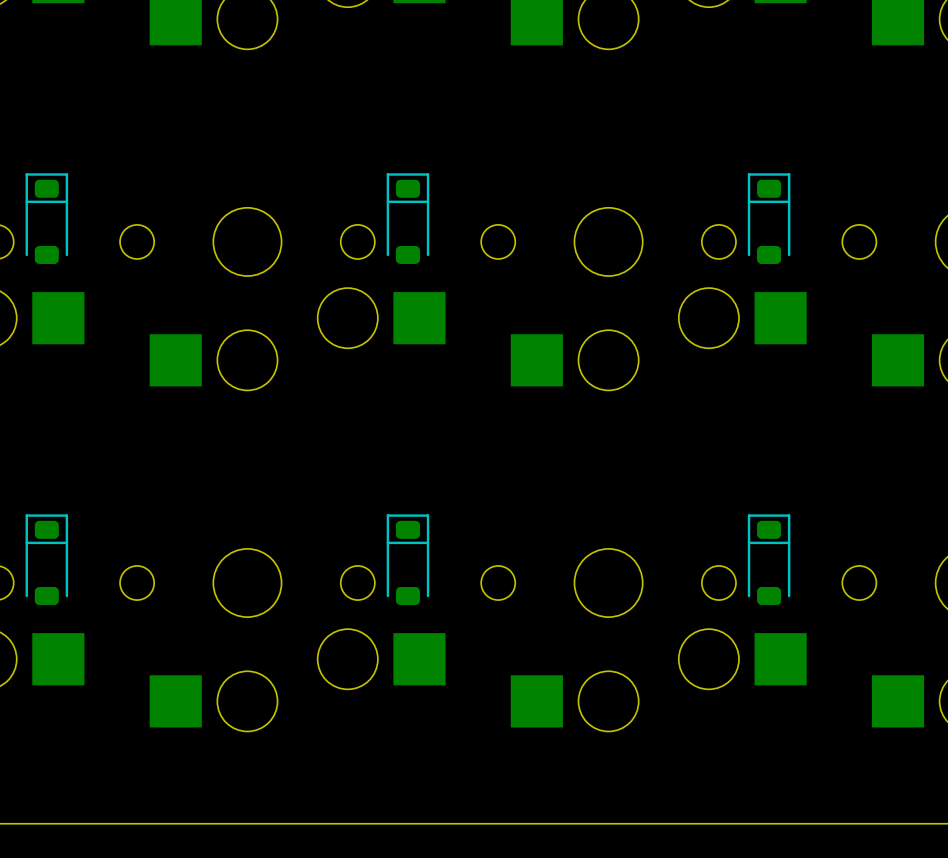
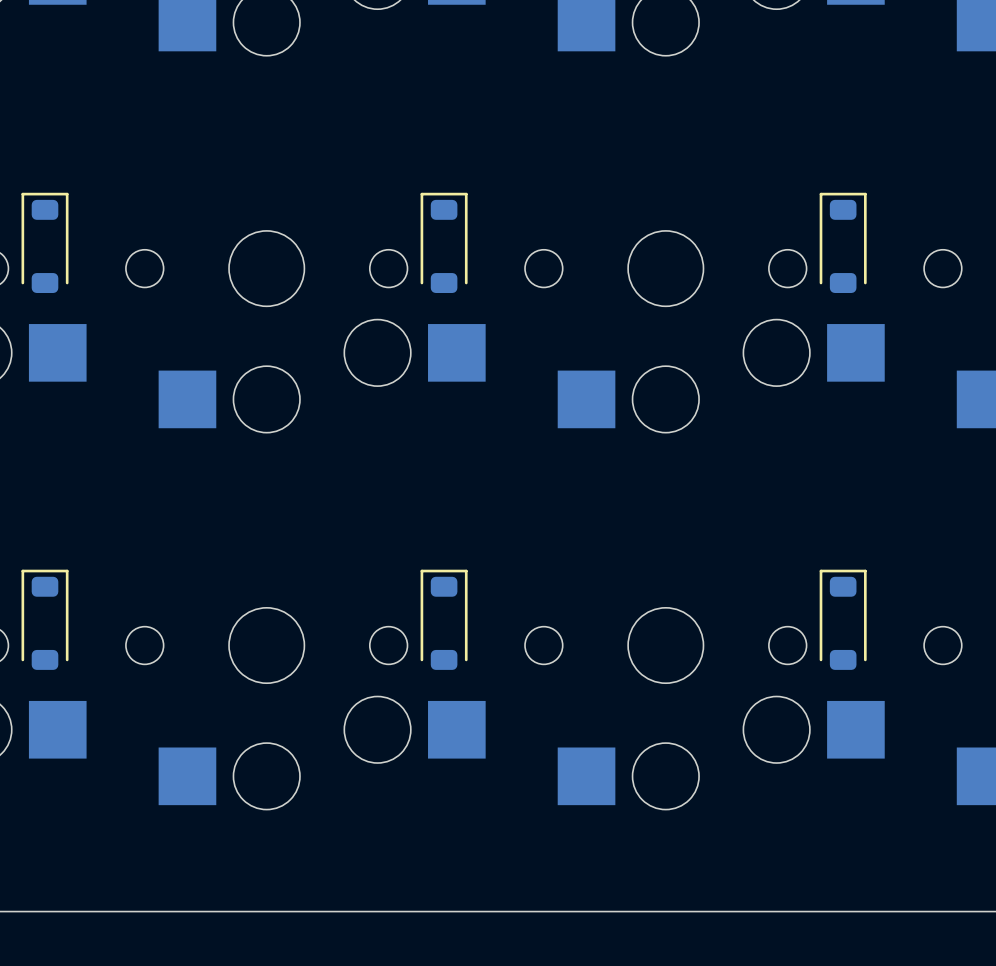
part footprint: [25, 173, 69, 265] -> [21, 192, 69, 293]
part footprint: [386, 173, 430, 265] -> [420, 192, 468, 293]
part footprint: [747, 173, 791, 265] -> [819, 192, 867, 293]
part footprint: [25, 514, 69, 606] -> [21, 569, 69, 670]
part footprint: [386, 514, 430, 606] -> [420, 569, 468, 670]
part footprint: [747, 514, 791, 606] -> [819, 569, 867, 670]

